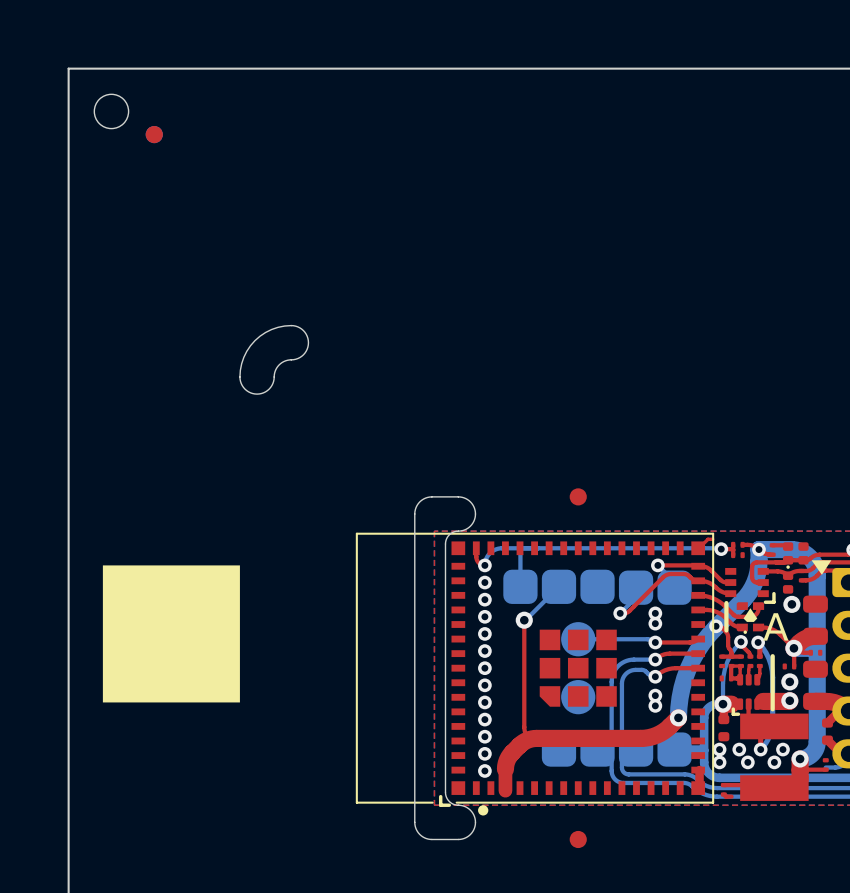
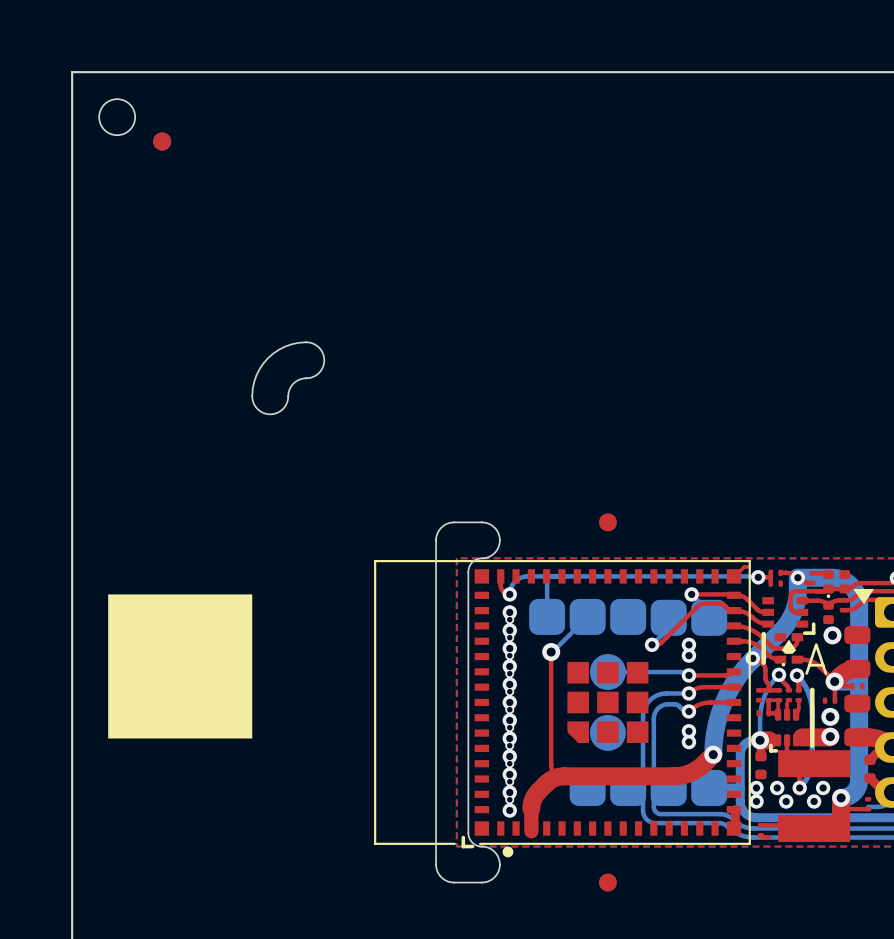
via: none -> (509, 619)
via: none -> (509, 637)
via: none -> (509, 655)
via: none -> (509, 673)
via: none -> (509, 691)
via: none -> (509, 709)
via: none -> (509, 727)
via: none -> (509, 745)
via: none -> (509, 763)
via: none -> (509, 781)
via: none -> (509, 799)

